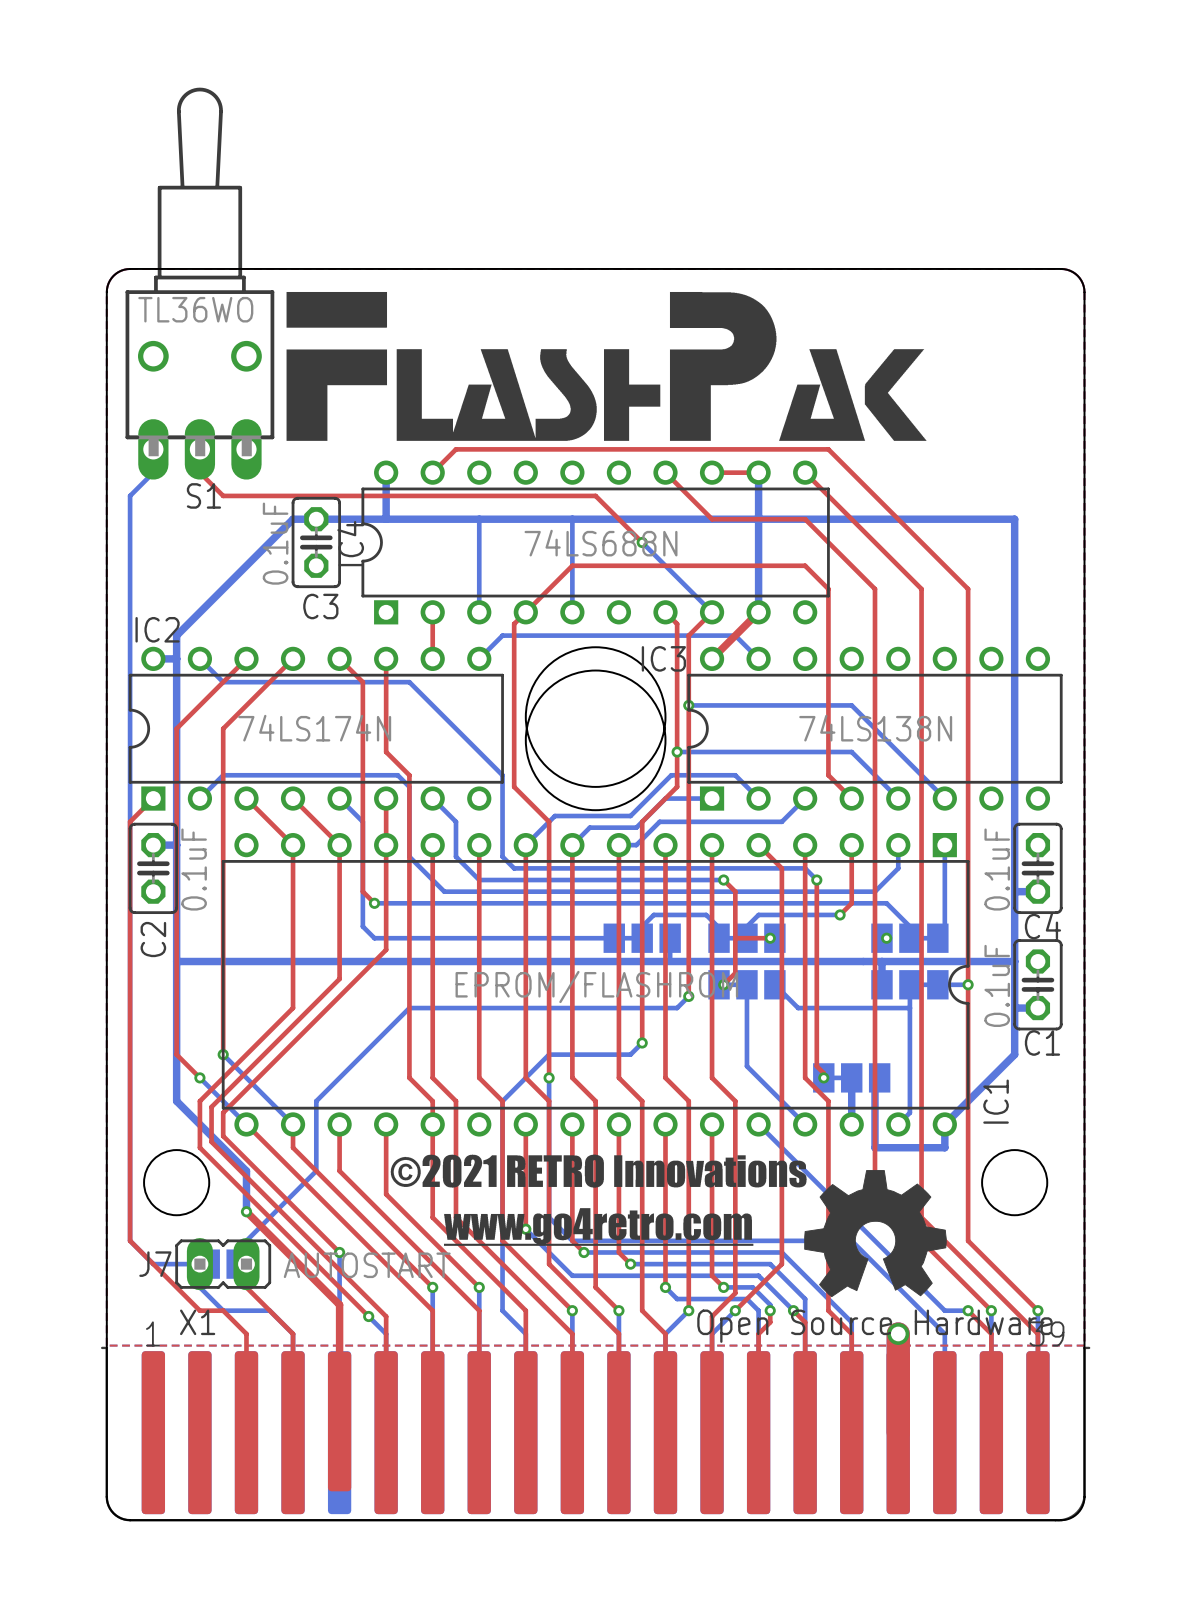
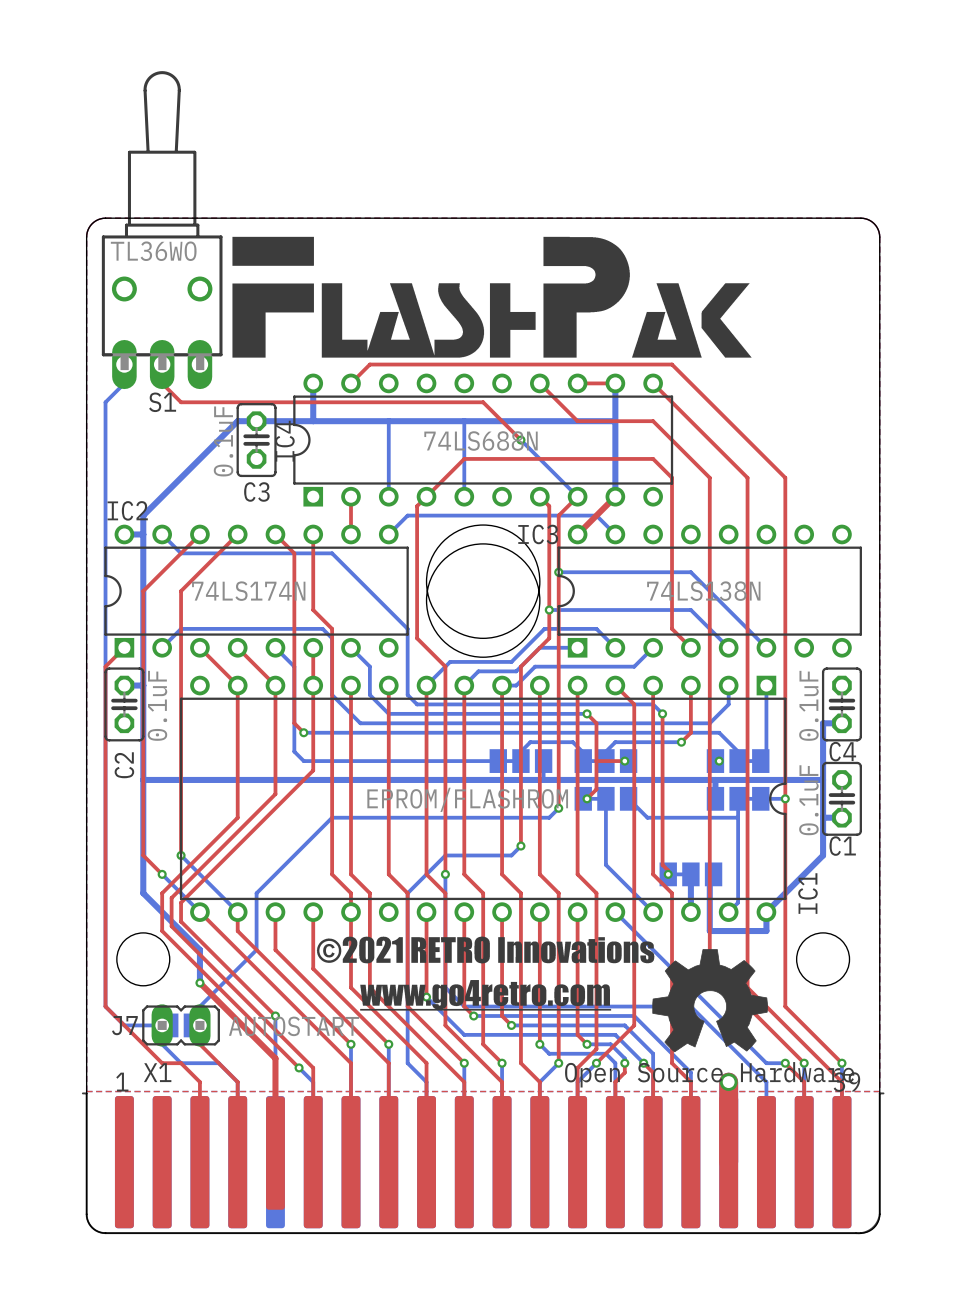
bottom track: (758, 519) (1014, 519) (1014, 891) -> none

